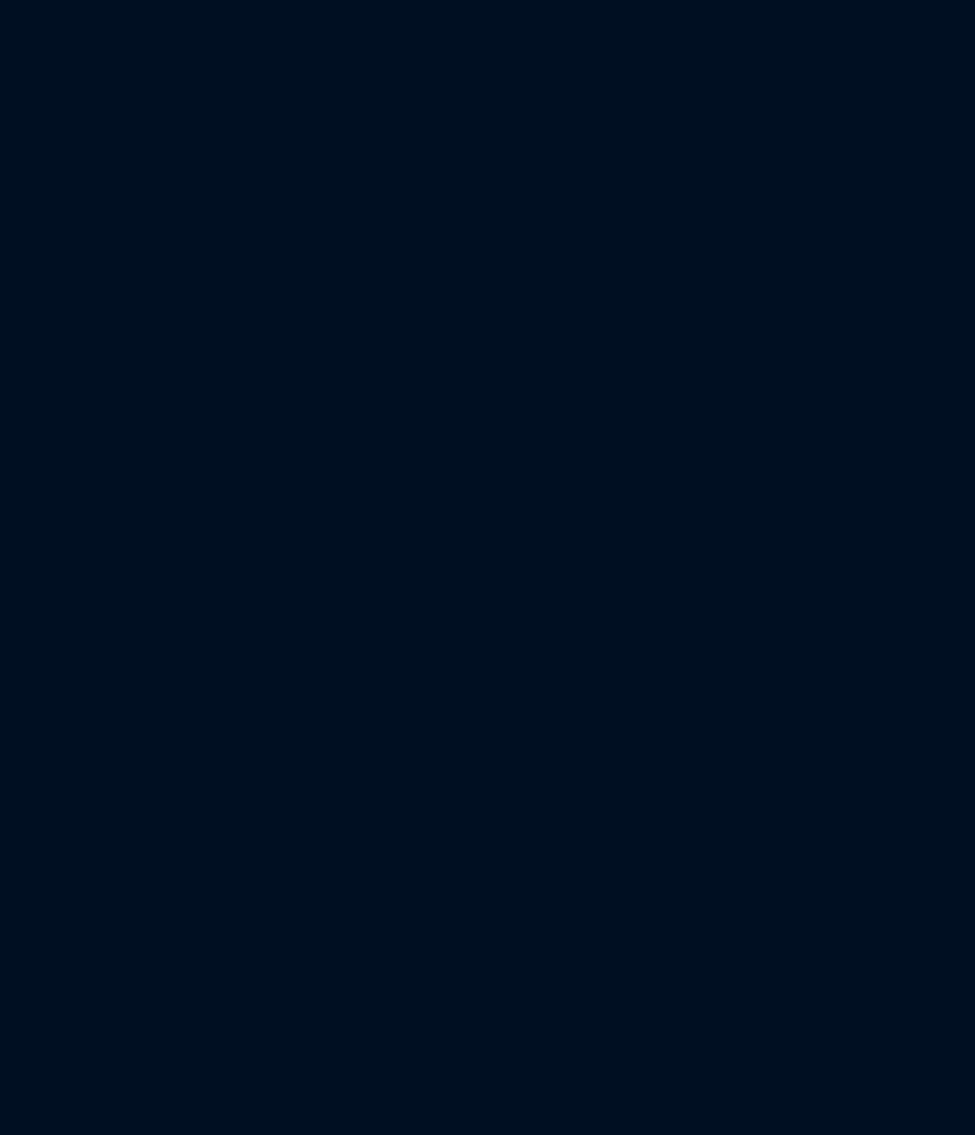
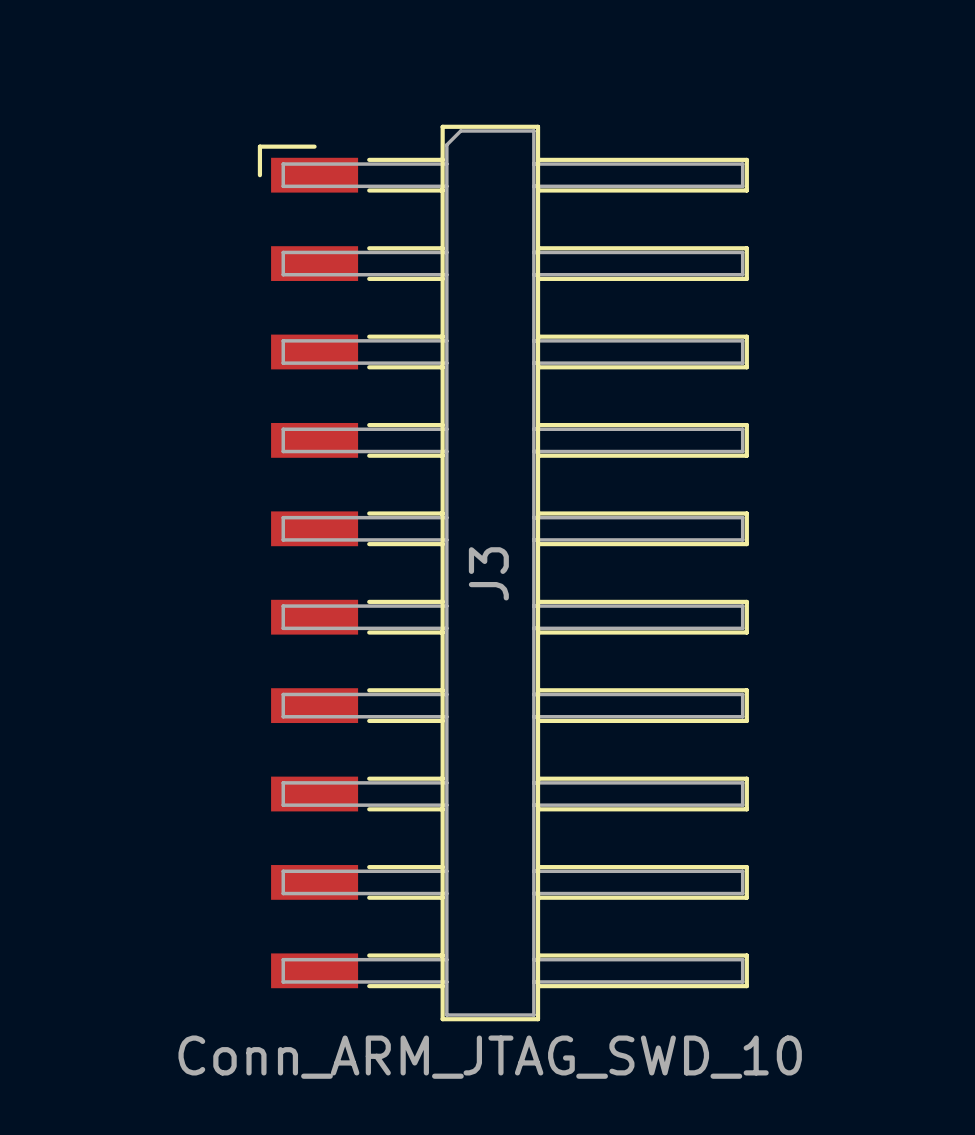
J3: none -> Conn_ARM_JTAG_SWD_10 (503, 573)

